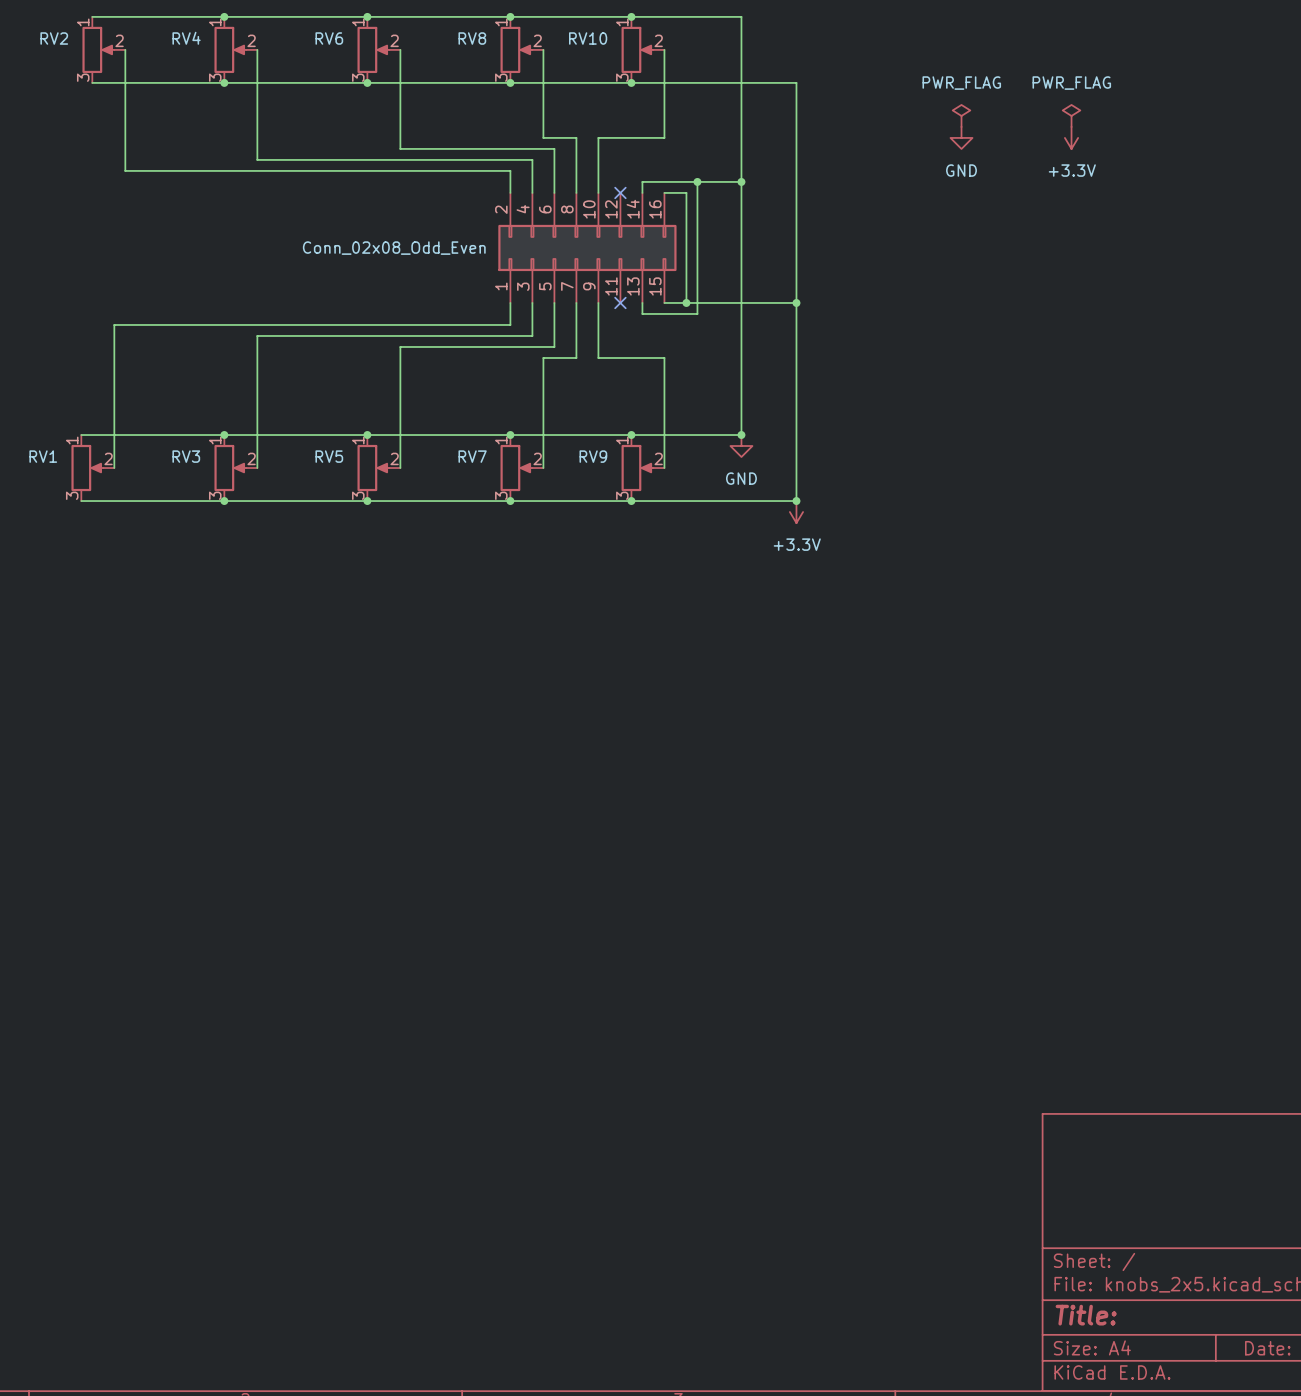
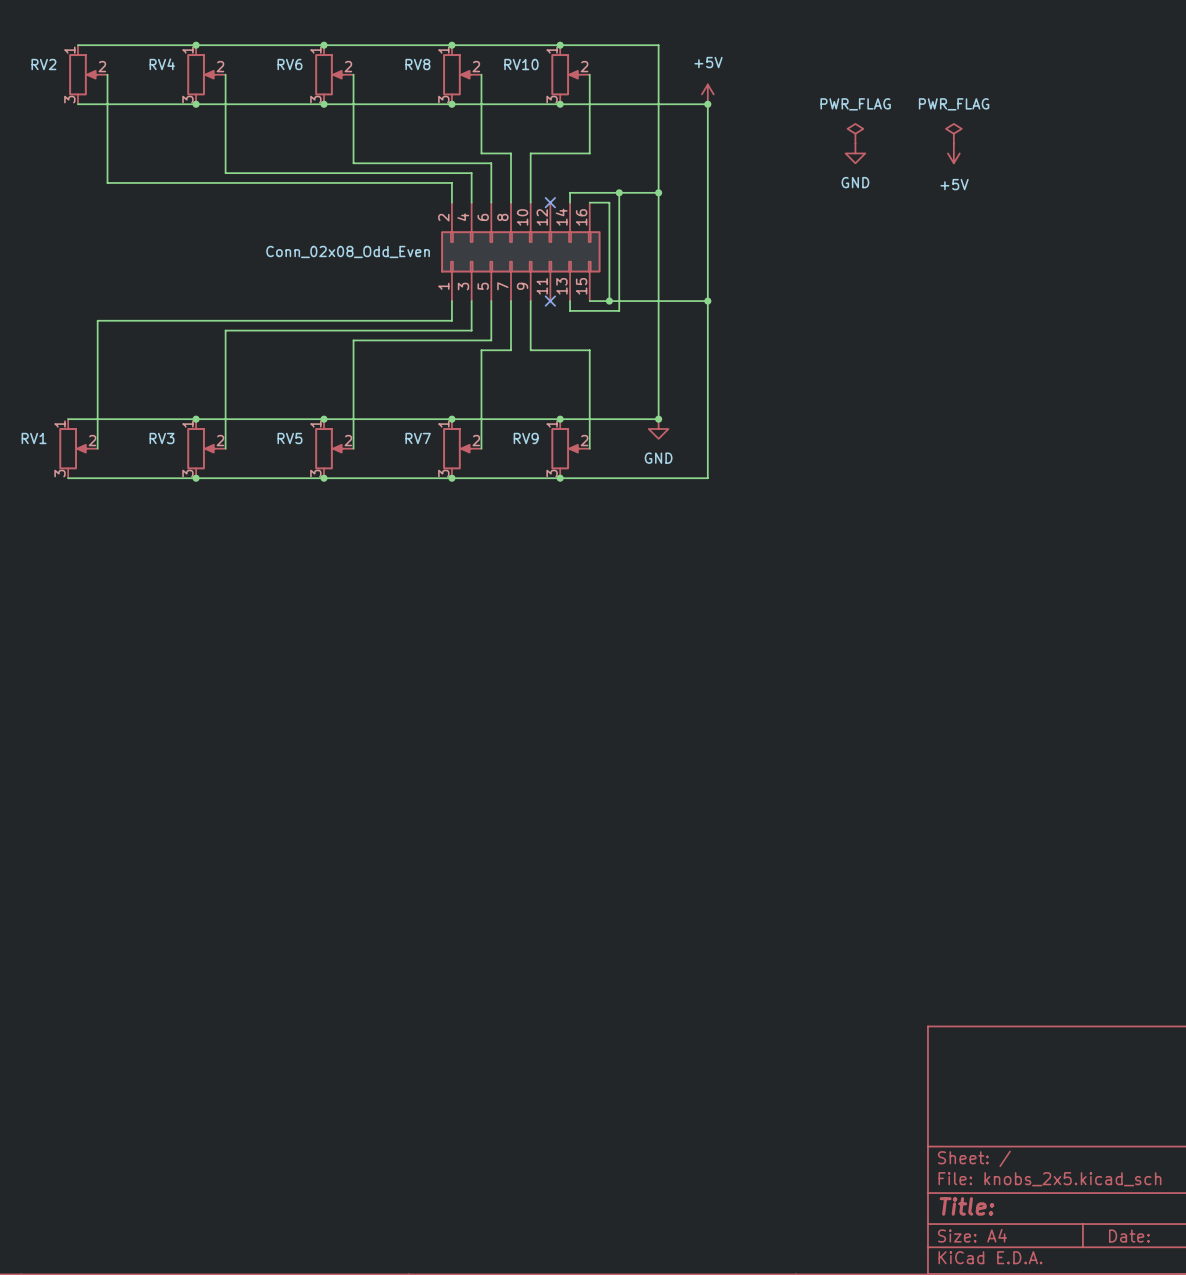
power symbol: none -> +5V (707, 94)
junction: none -> (707, 104)
power symbol: +3.3V (1071, 137) -> +5V (953, 153)
junction: (796, 501) -> none
power symbol: +3.3V (796, 512) -> none

